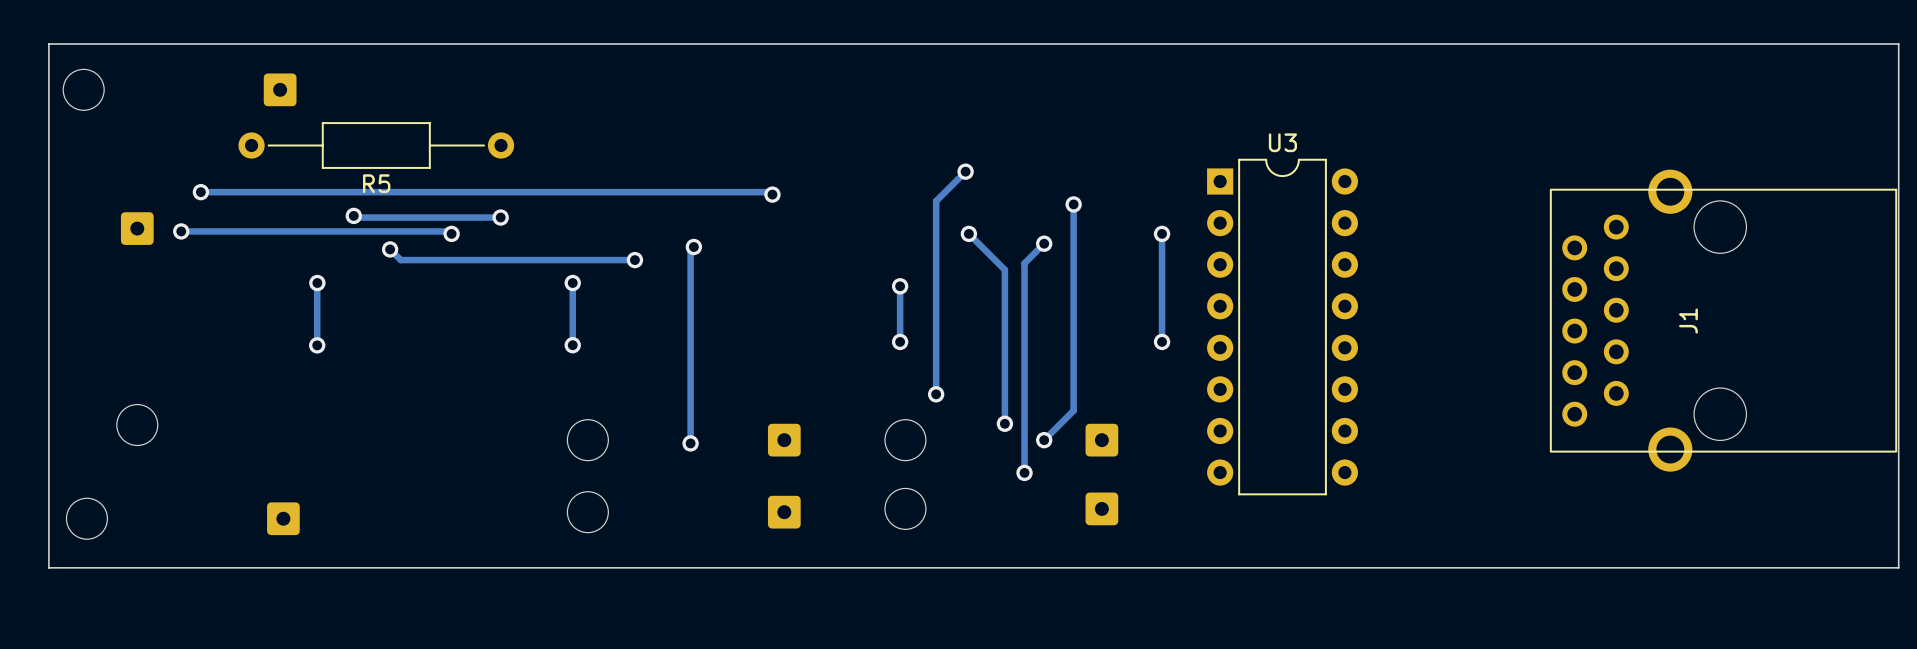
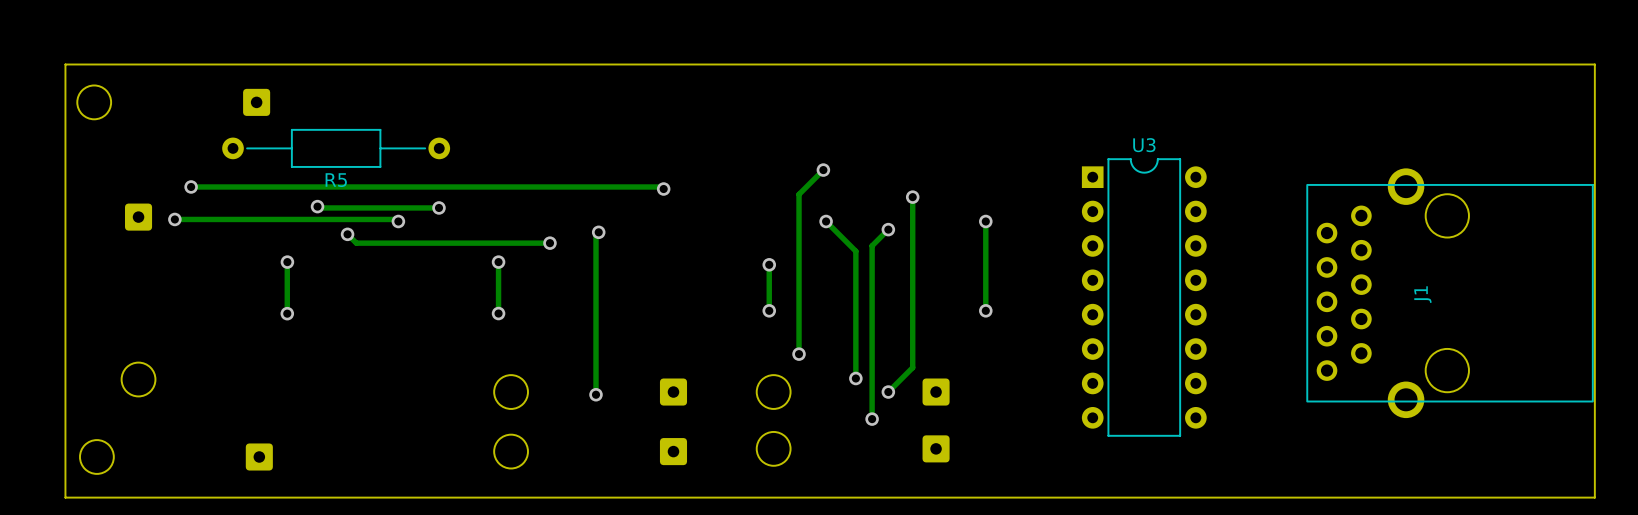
U3 position: (1282, 327) -> (1144, 297)

